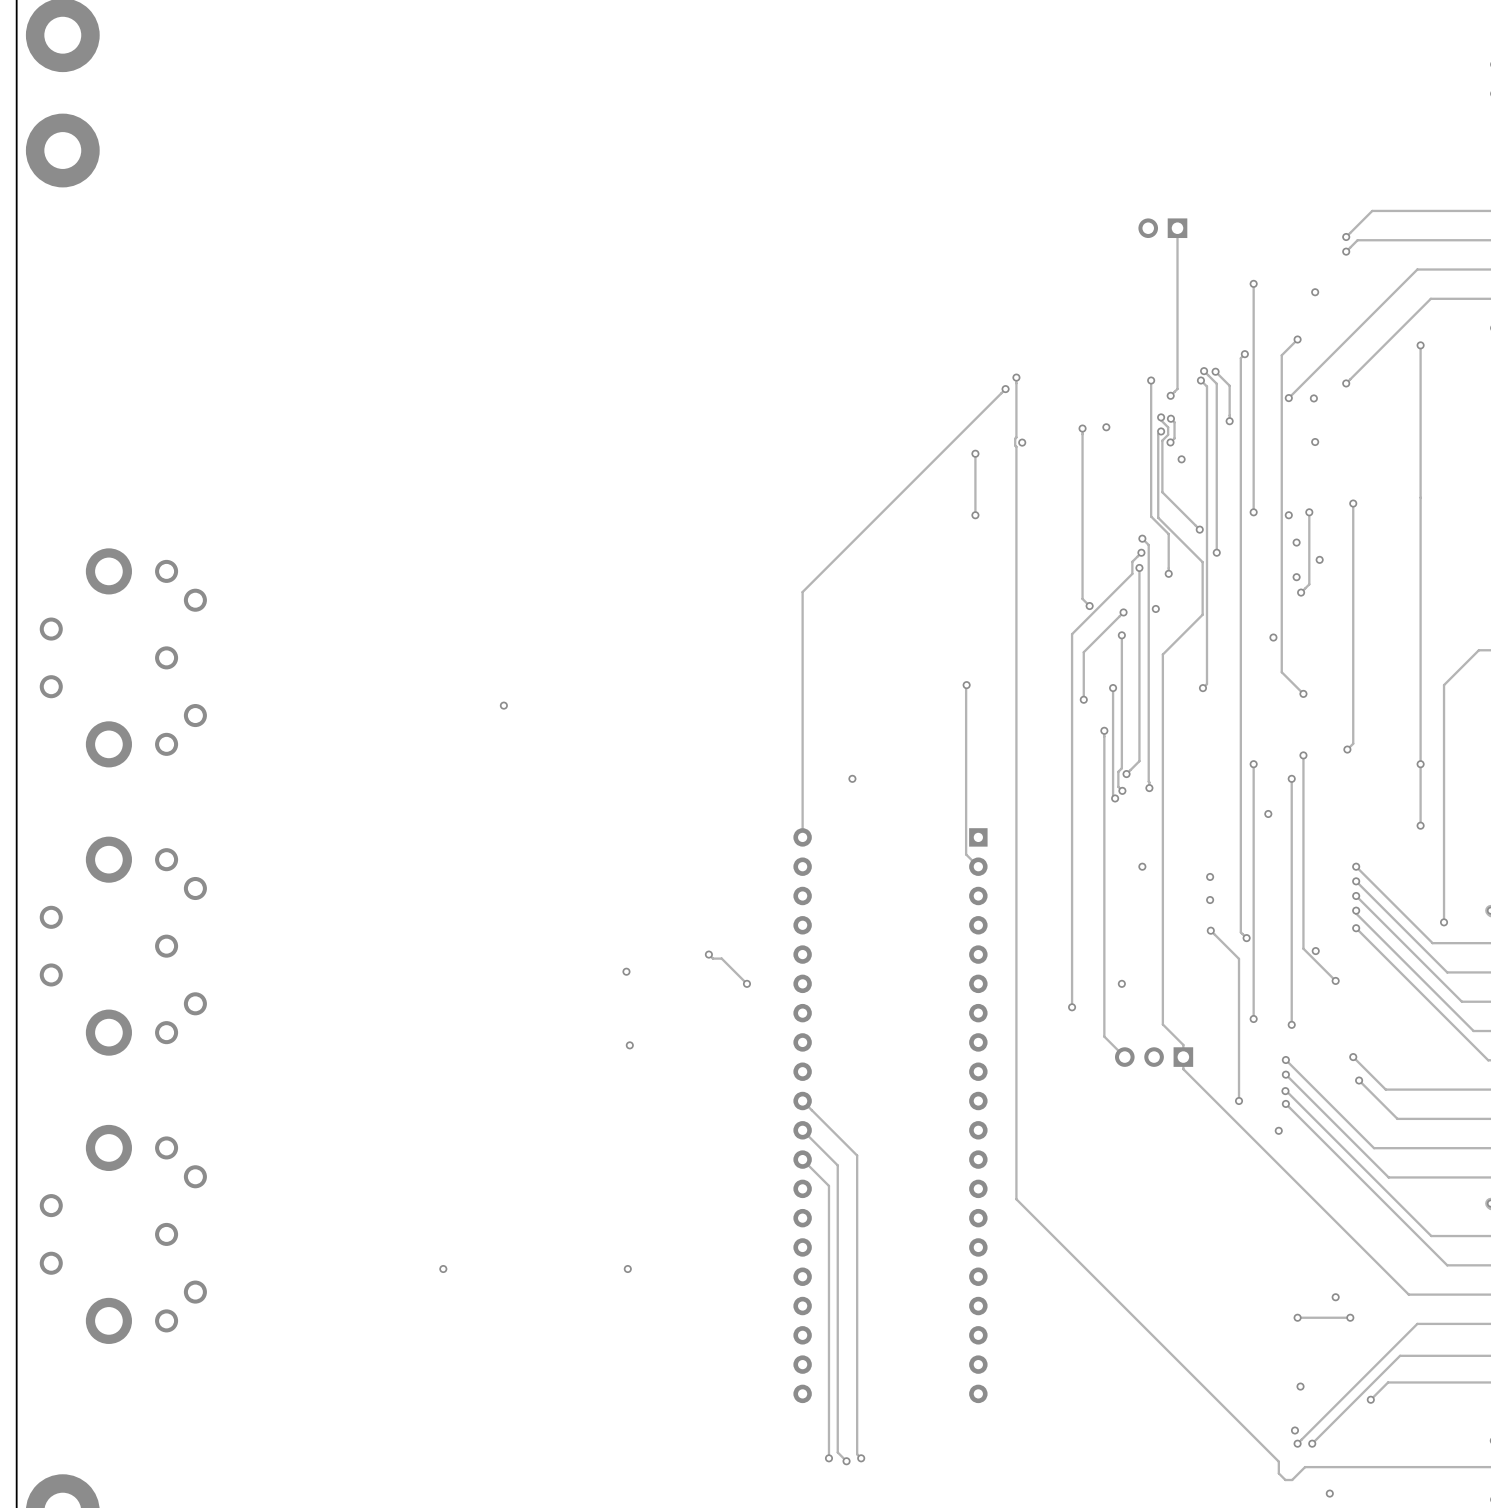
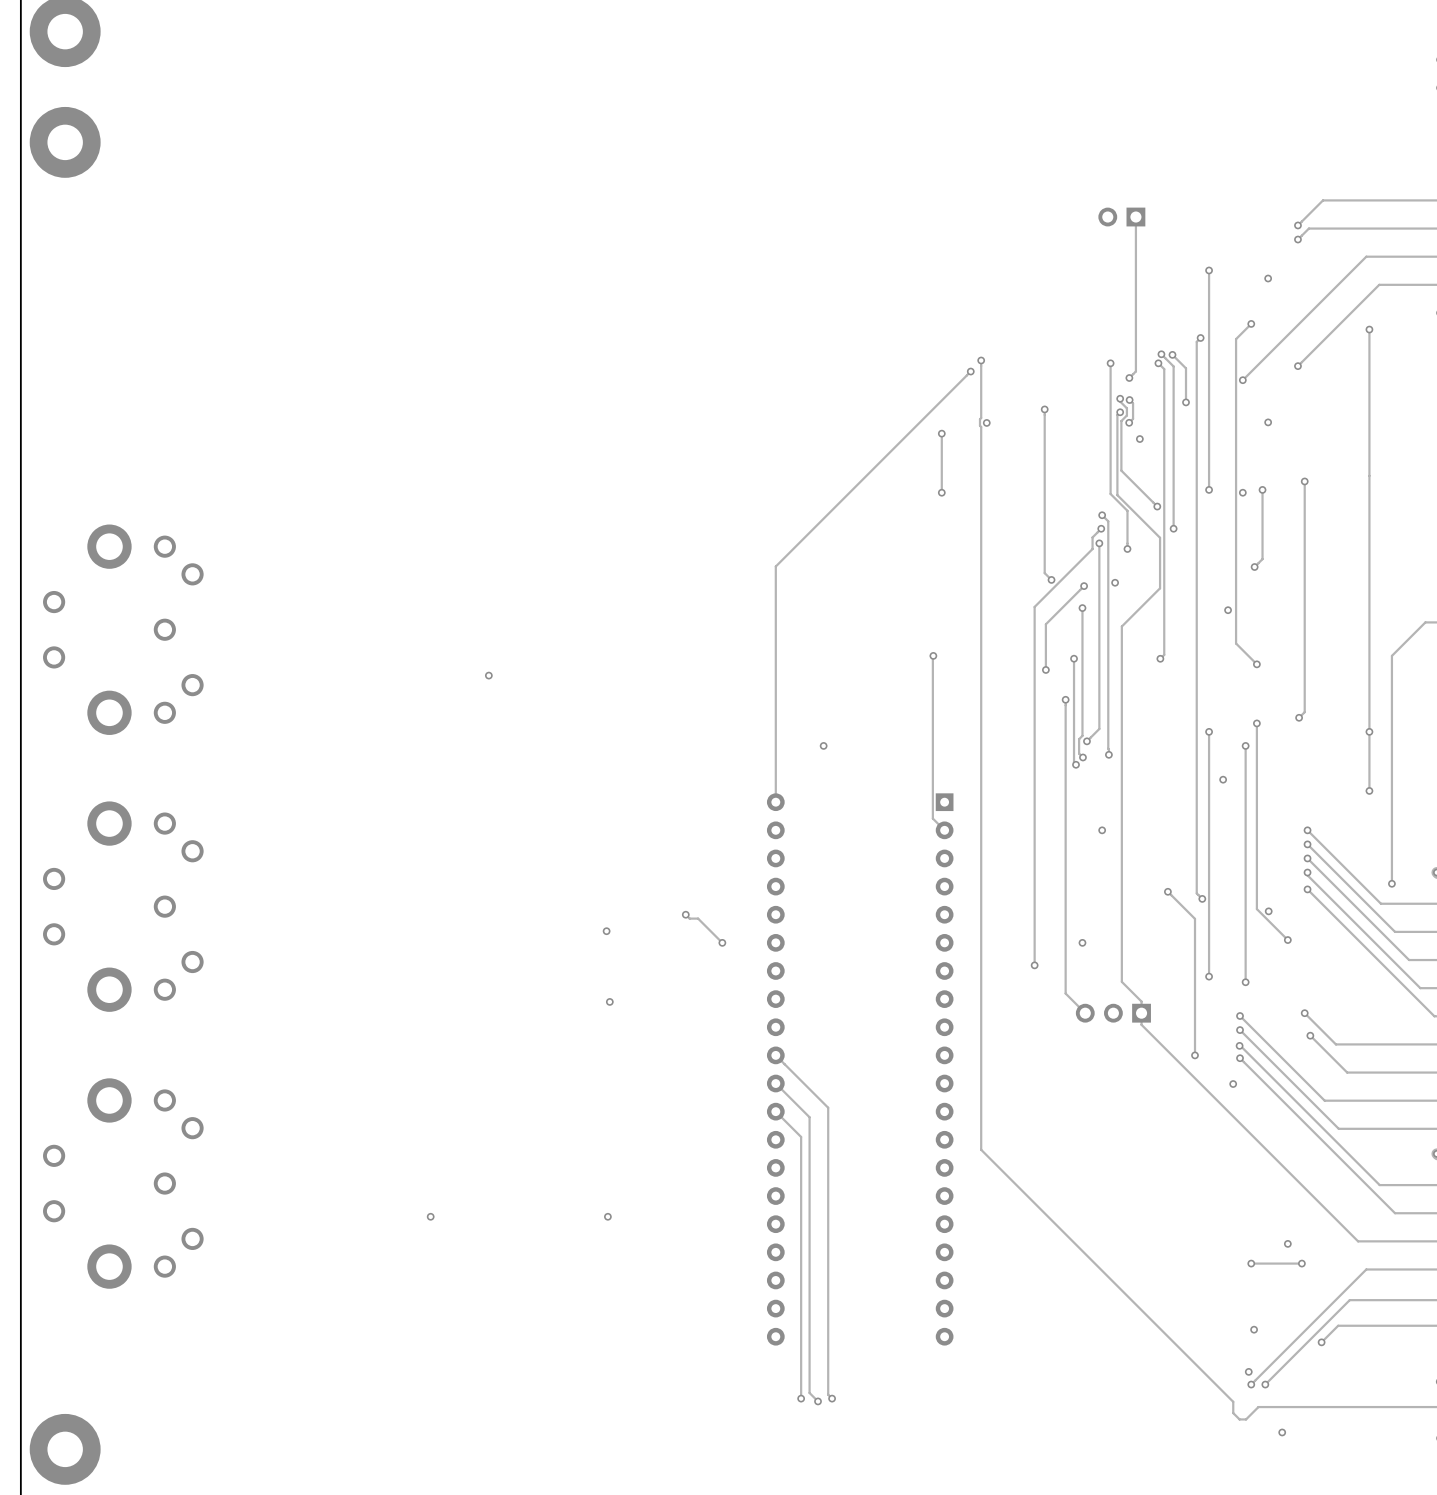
via: (1313, 398) -> none
via: (1106, 427) -> none
via: (1296, 542) -> none
via: (1319, 559) -> none
via: (1296, 577) -> none
via: (1210, 876) -> none
via: (1210, 900) -> none

